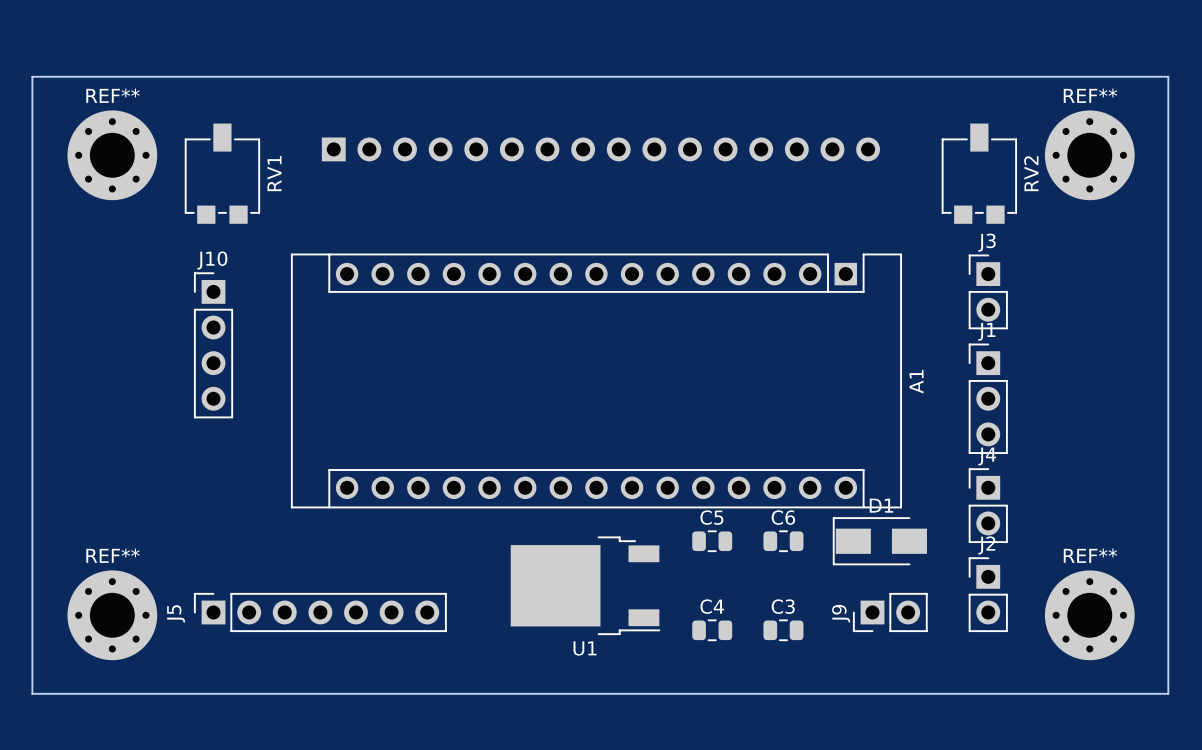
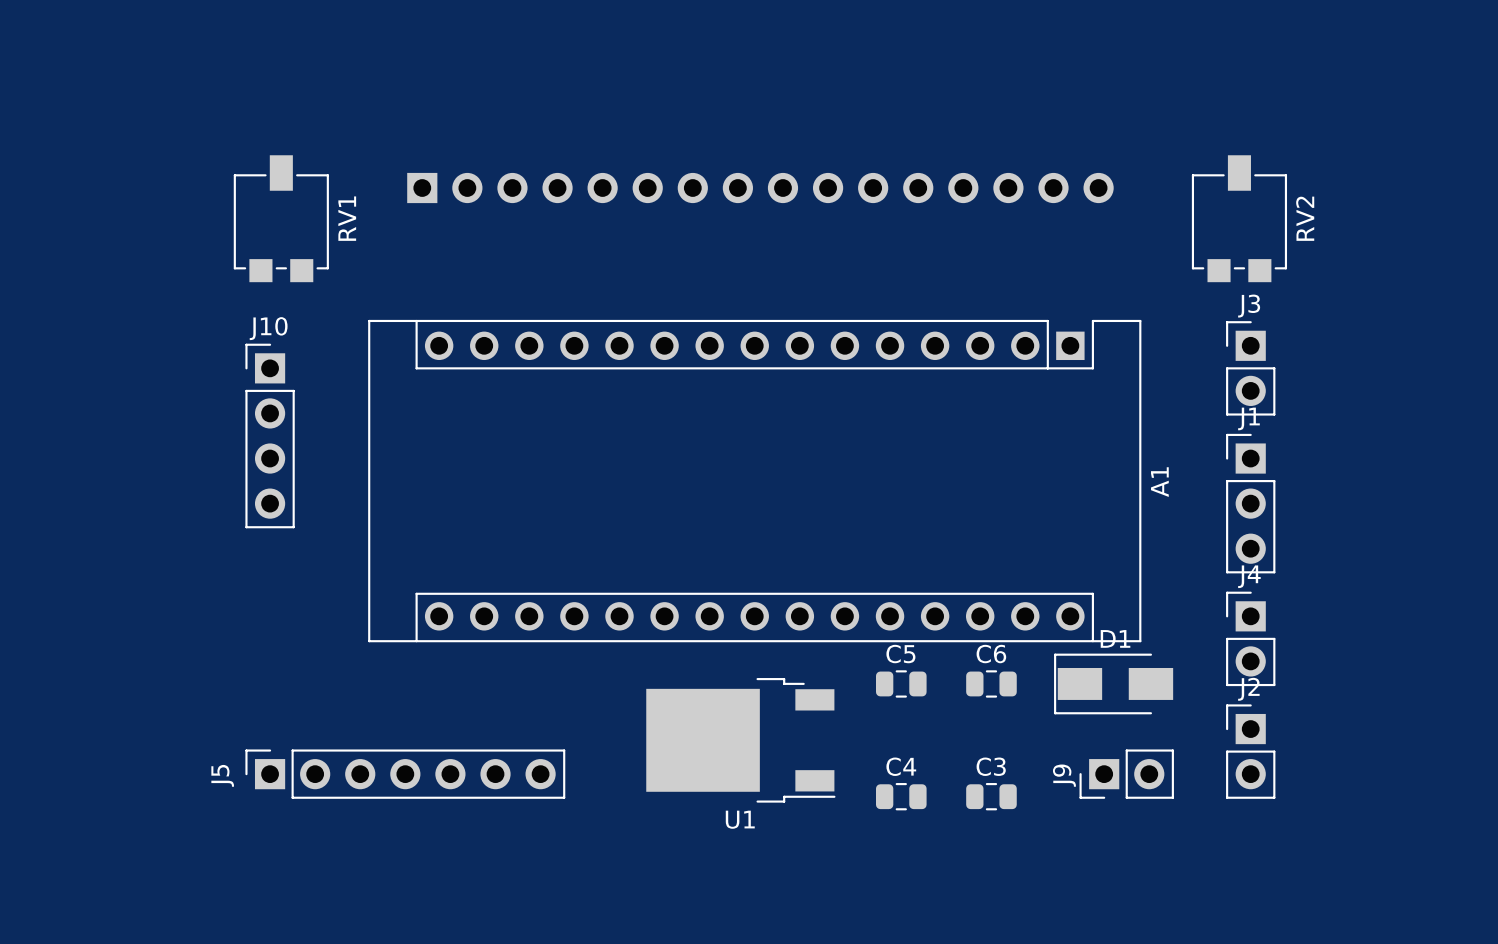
board edge: (32, 76) (32, 693) (1168, 693) (1168, 76) (32, 76) -> none
REF**: (112, 155) -> none
REF**: (1089, 155) -> none
REF**: (112, 615) -> none
REF**: (1089, 615) -> none

